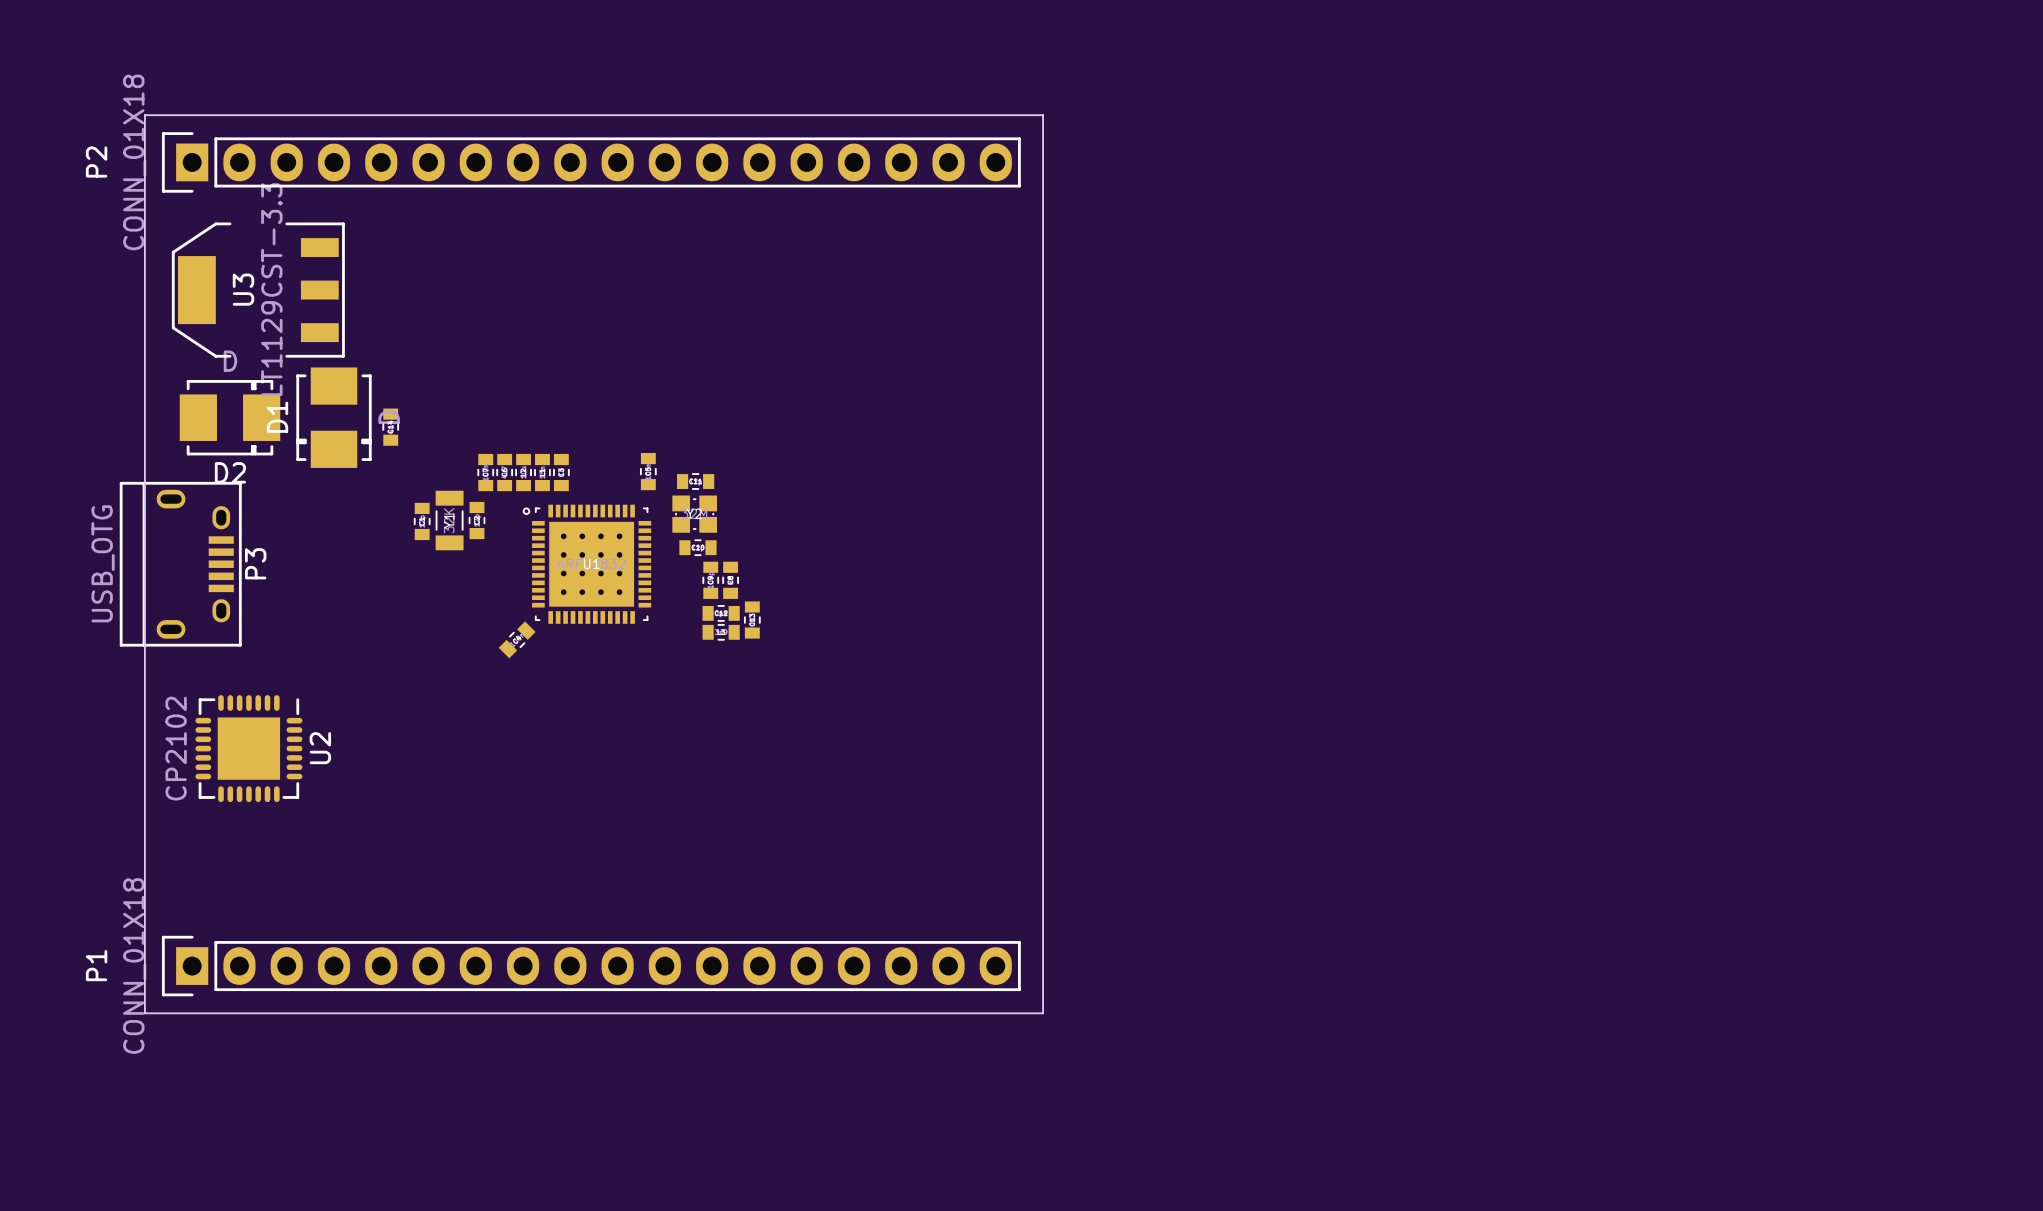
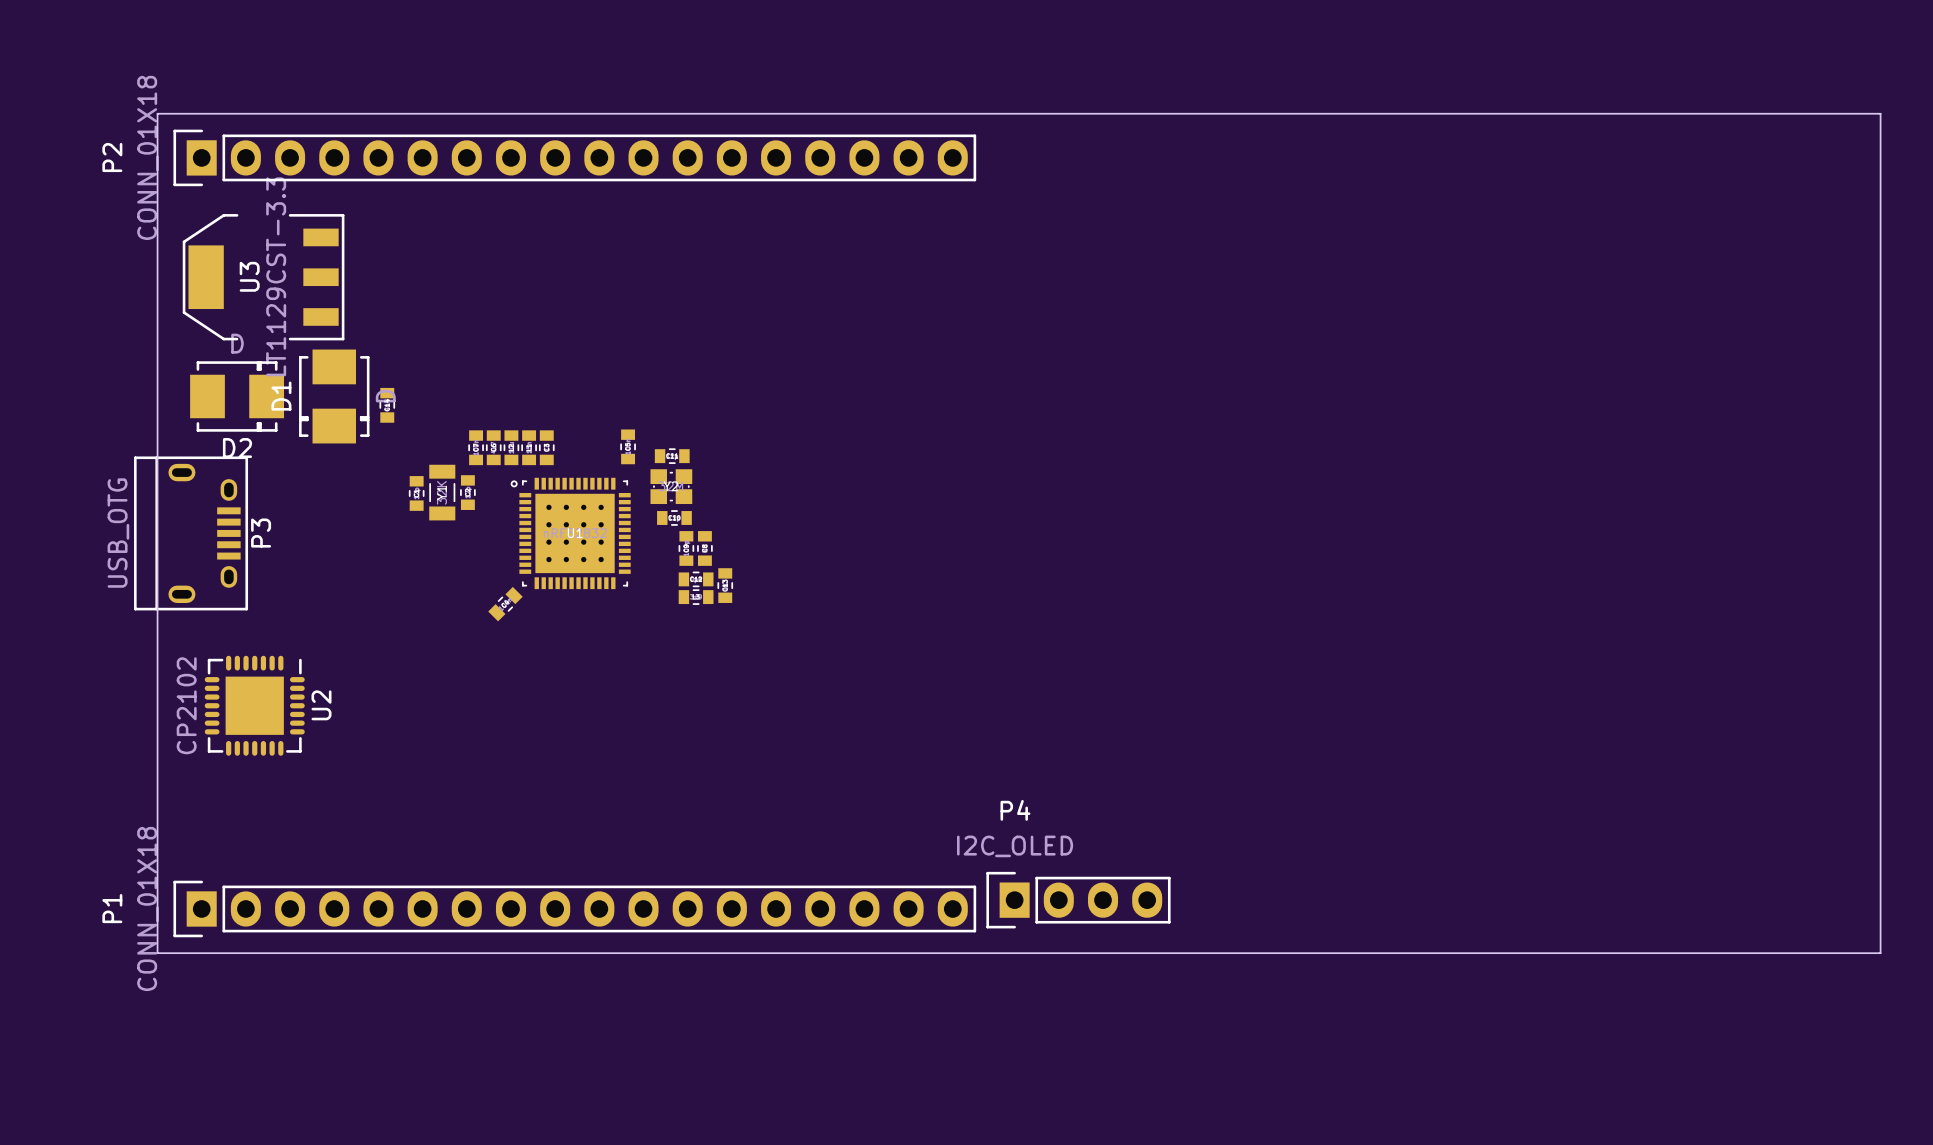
board edge: (1043, 115) (1043, 1013) -> (996, 113) (1880, 113) (1880, 953) (996, 953)
P4: none -> I2C_OLED (1078, 900)

